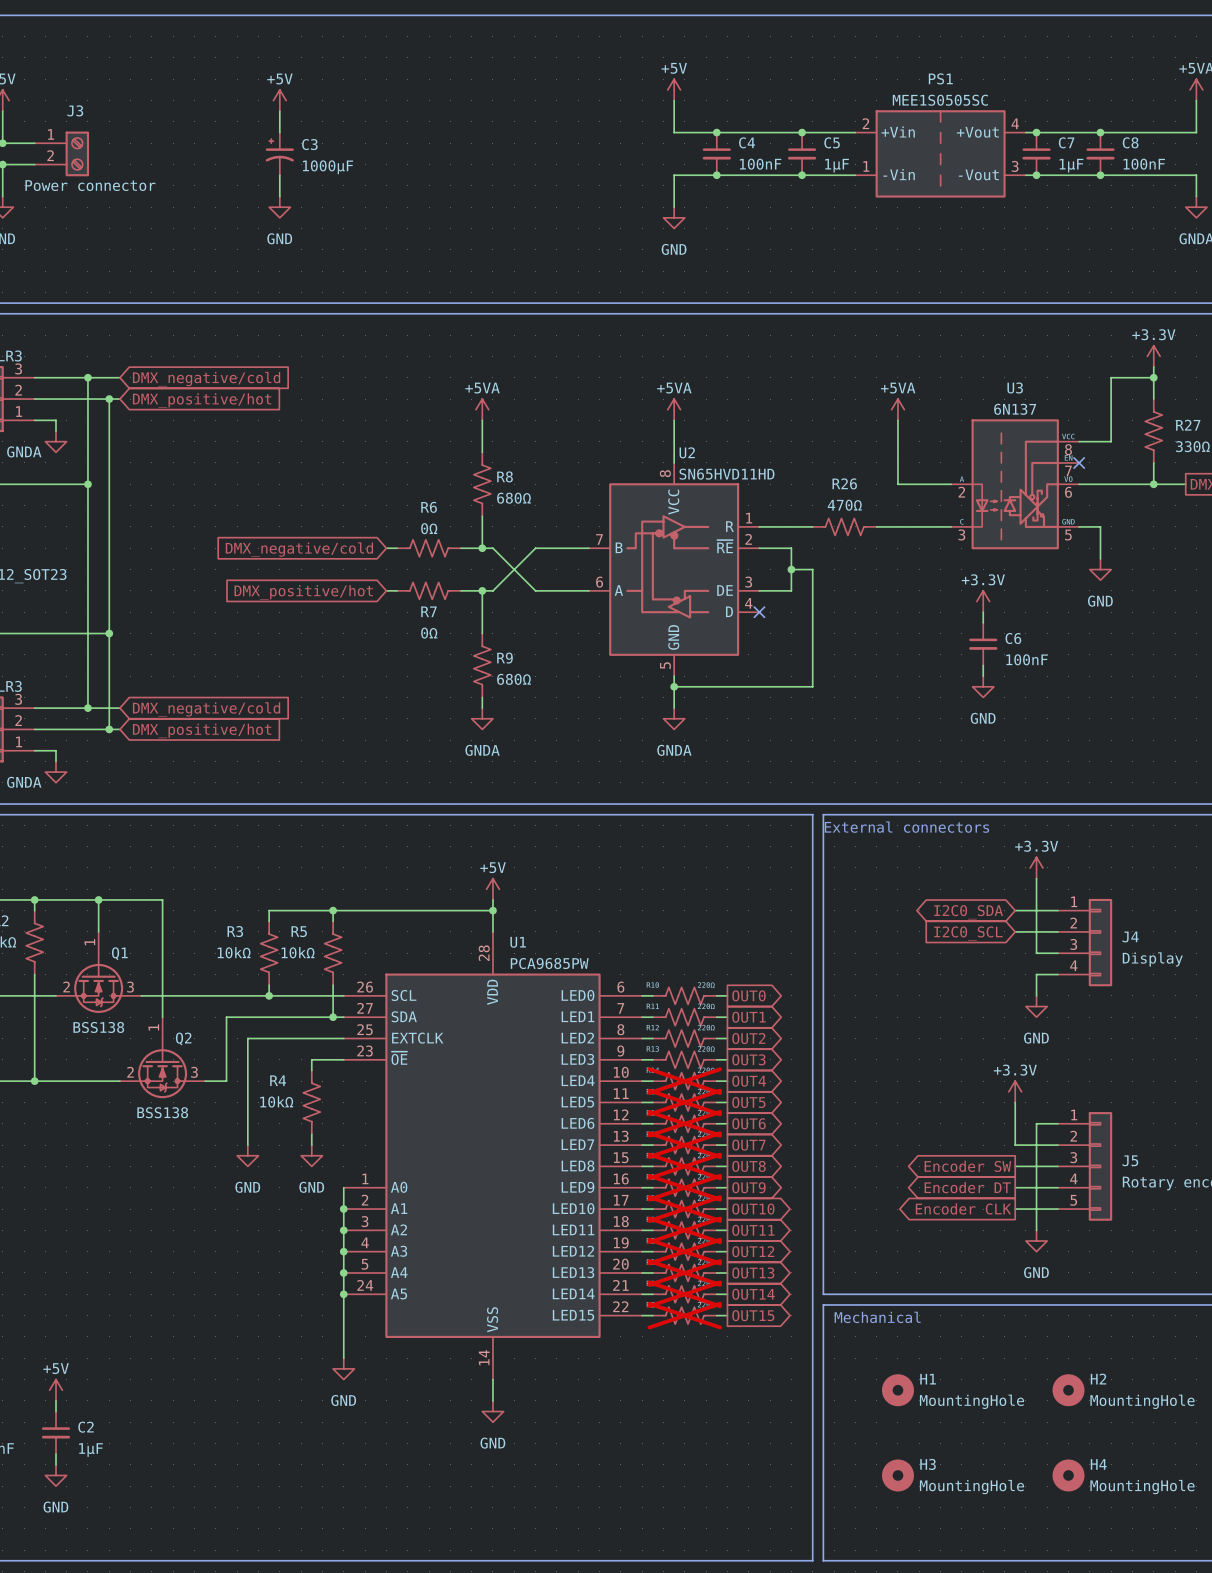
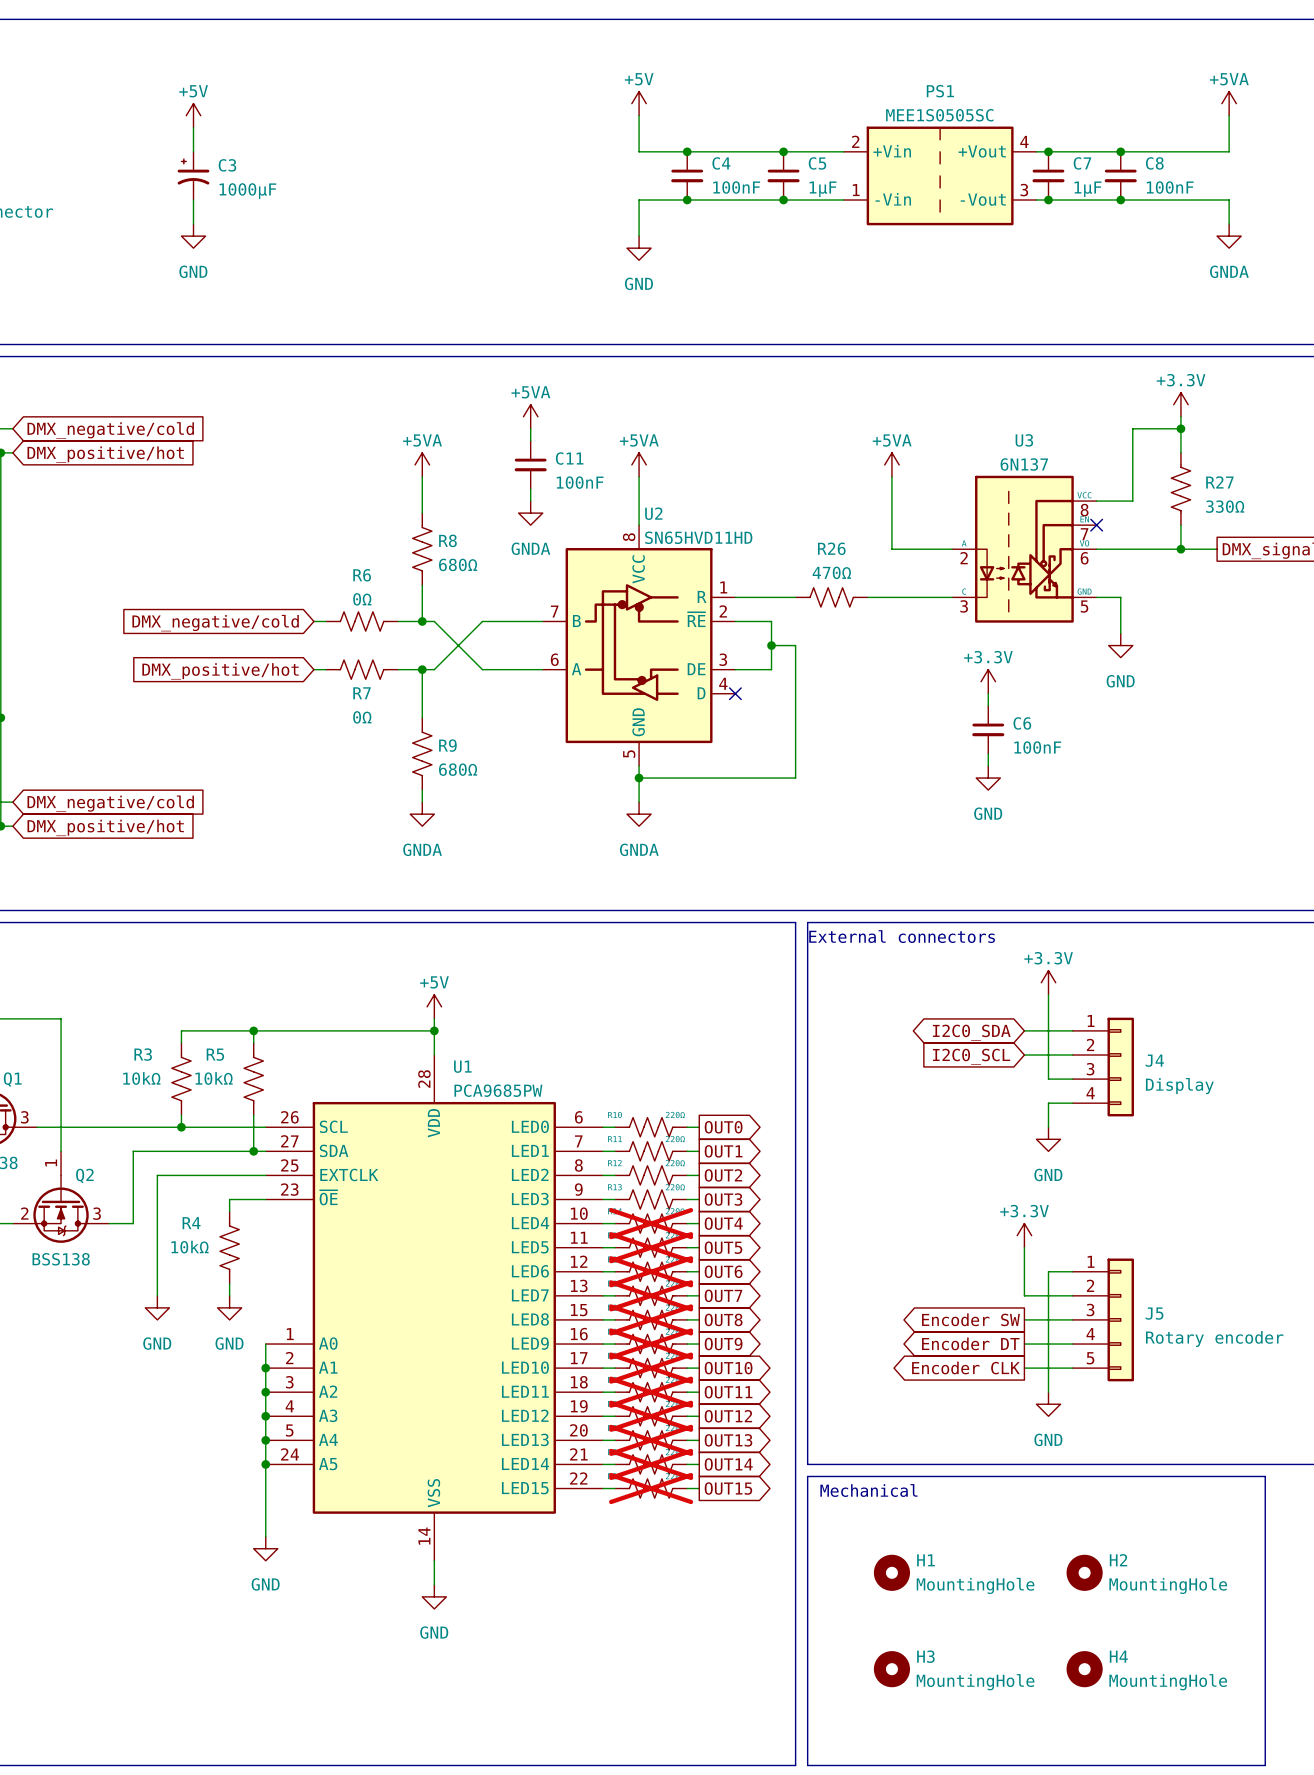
power symbol: none -> +5VA (530, 416)
wire: none -> (530, 428) (530, 440)
C11: none -> 100nF (530, 464)
wire: none -> (530, 489) (530, 501)
power symbol: none -> GNDA (530, 513)

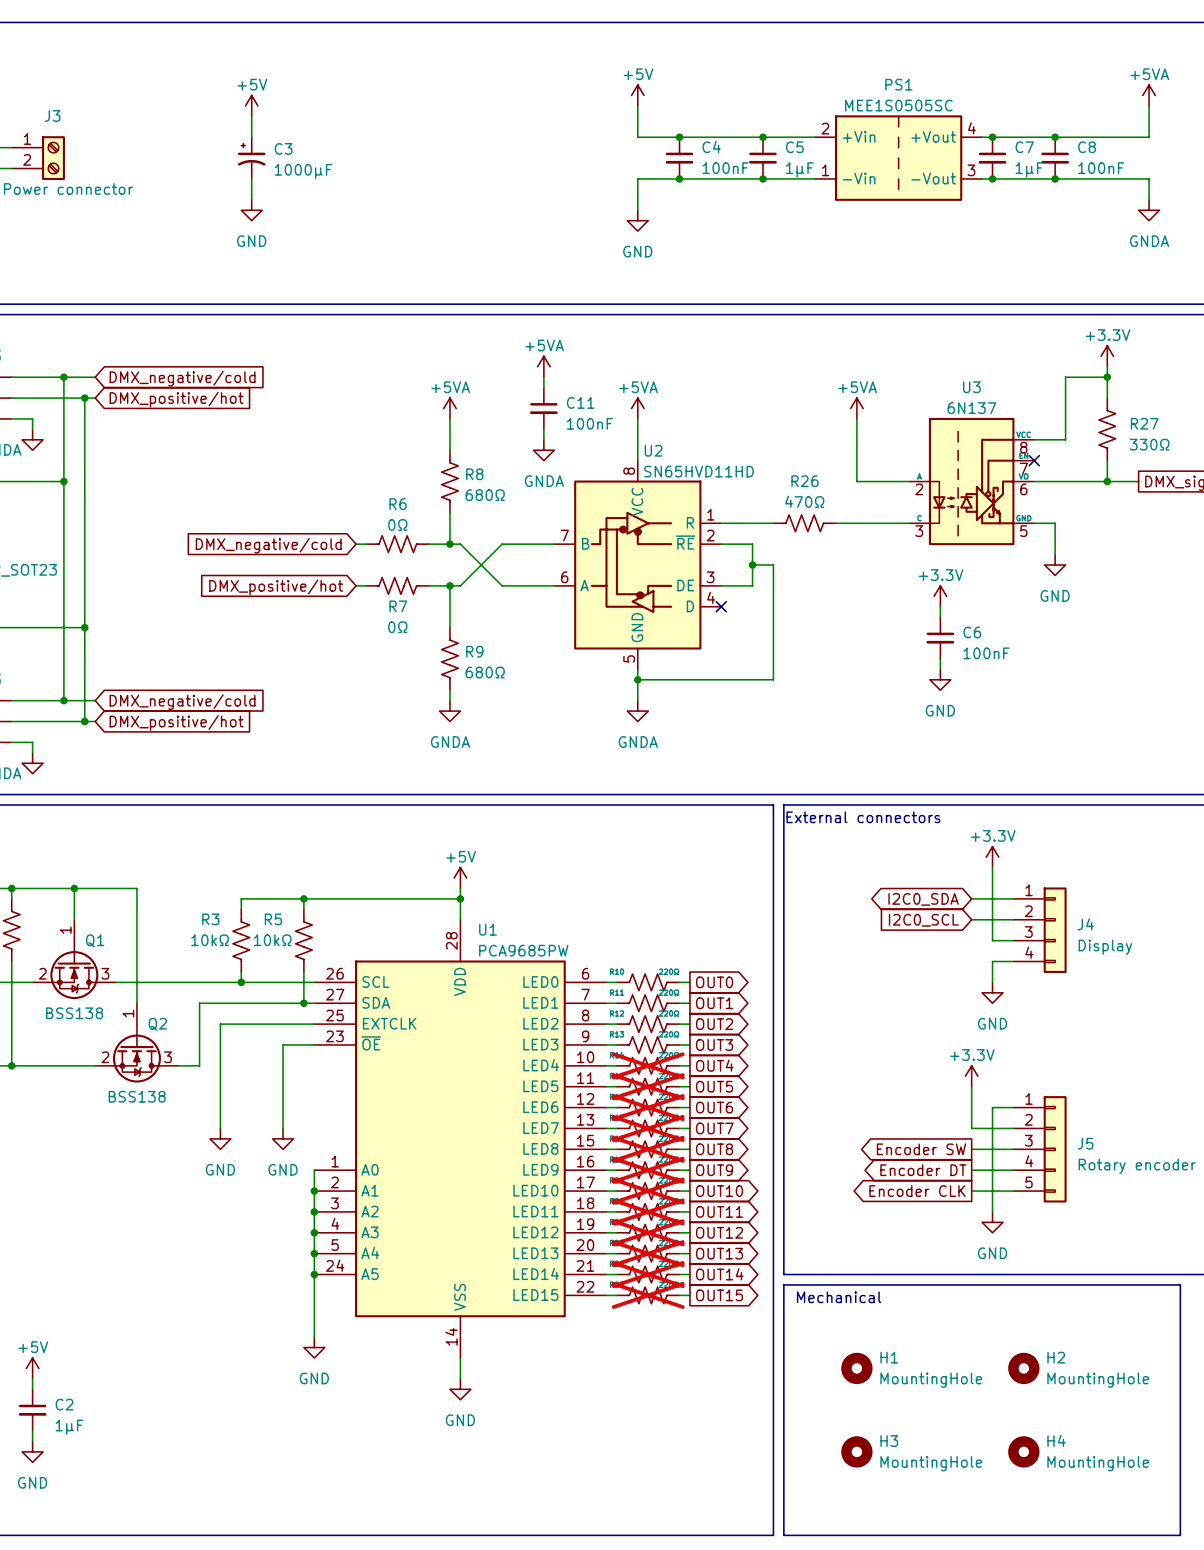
R4: 10kΩ (229, 1247) -> none

